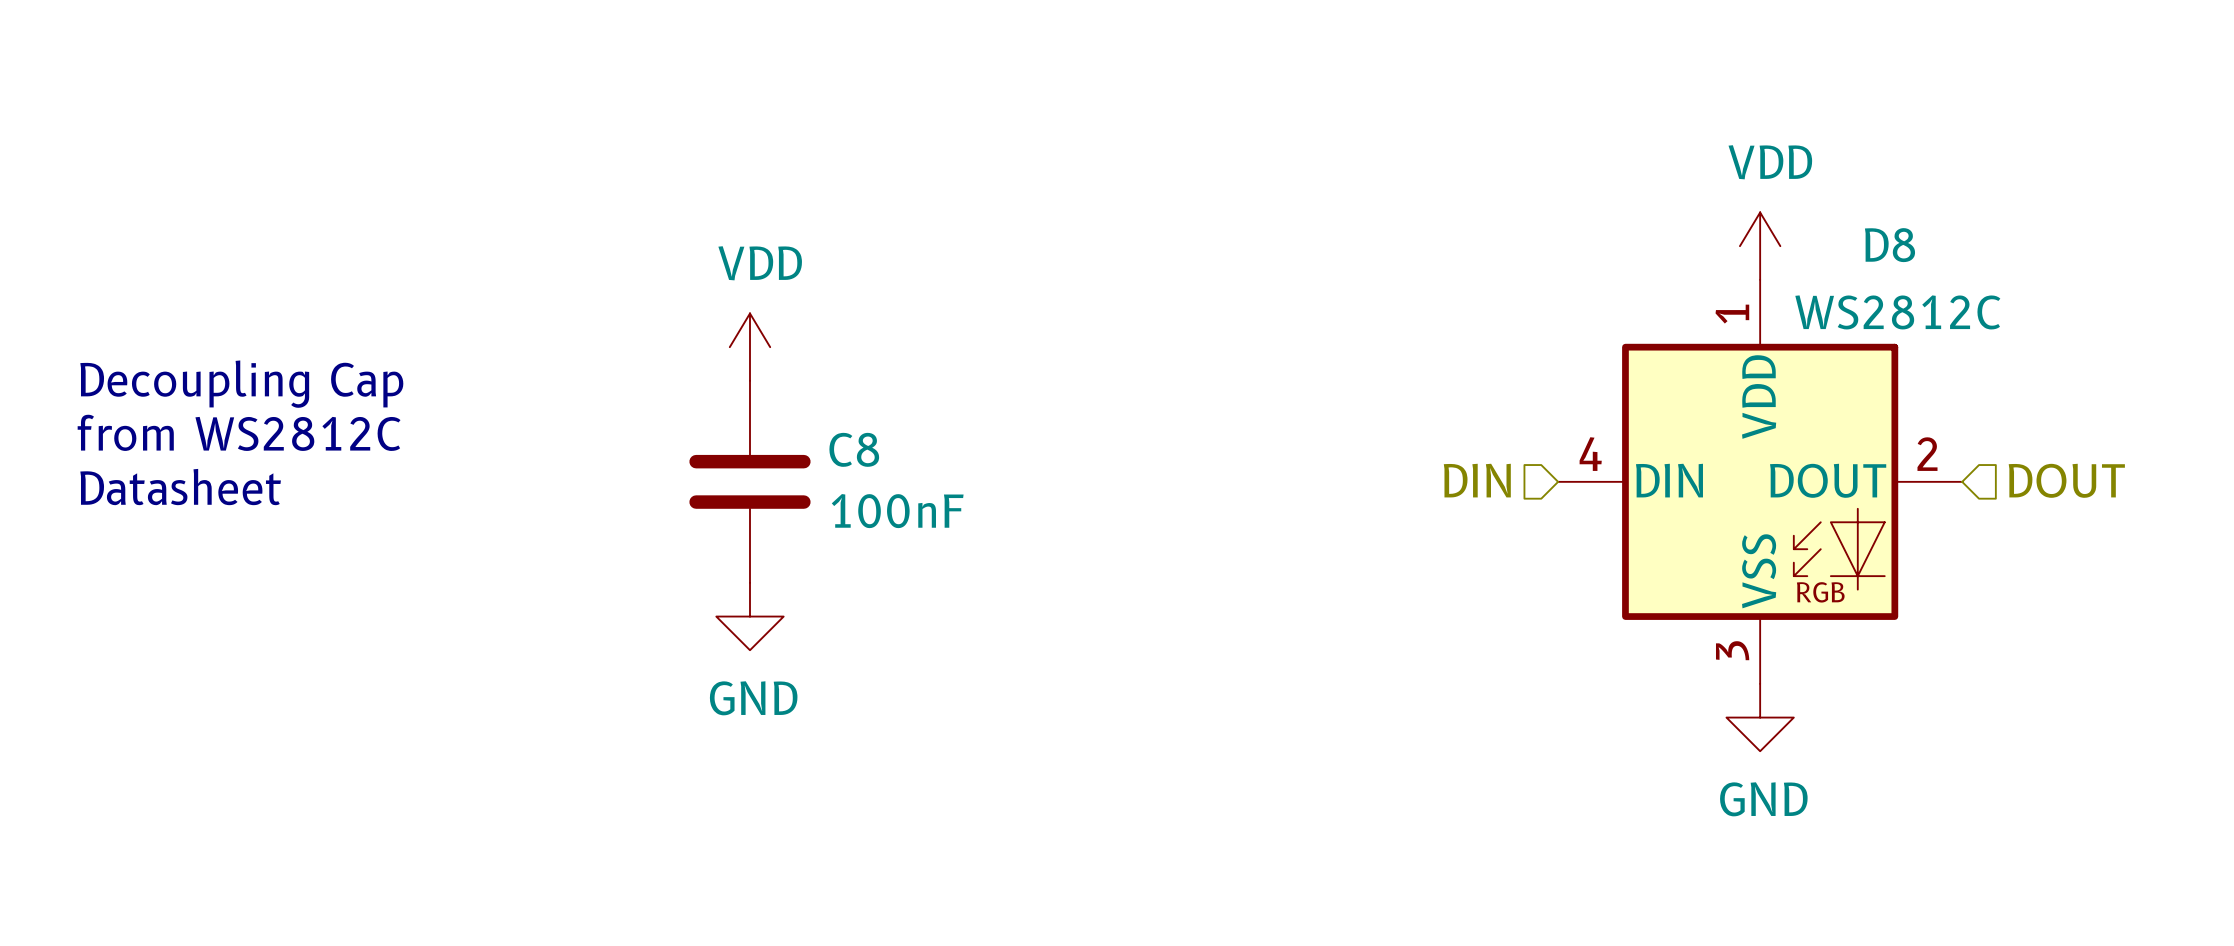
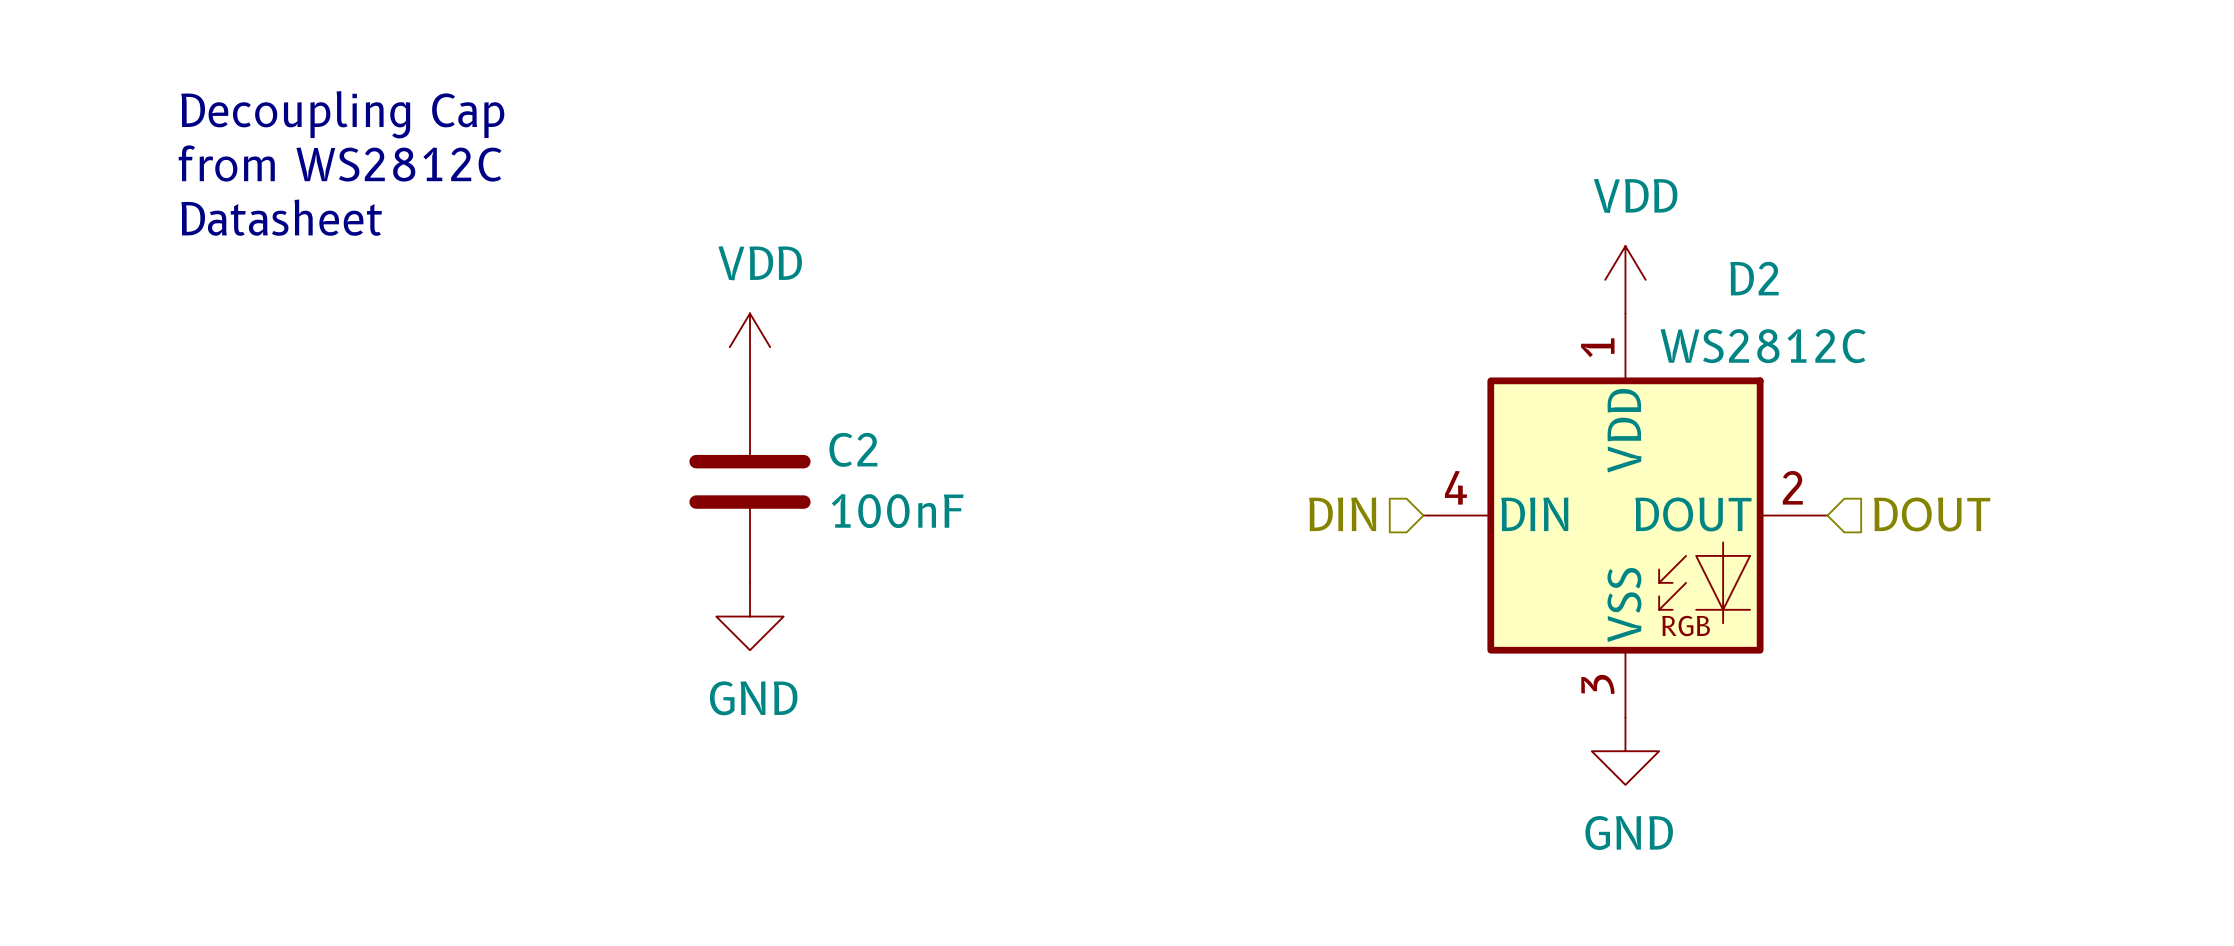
power symbol position: VDD (1760, 246) -> VDD (1625, 279)
text position: Decoupling Cap (241, 384) -> Decoupling Cap (342, 114)
text position: from WS2812C (239, 432) -> from WS2812C (340, 163)
C8 name: C8 (854, 449) -> C2 (853, 449)
hierarchical label position: DIN (1477, 480) -> DIN (1342, 514)
hierarchical label position: DOUT (2066, 480) -> DOUT (1932, 514)
D8: WS2812C (1760, 481) -> none
text position: Datasheet (180, 487) -> Datasheet (281, 217)
D2: none -> WS2812C (1625, 515)
power symbol position: GND (1760, 717) -> GND (1625, 751)

